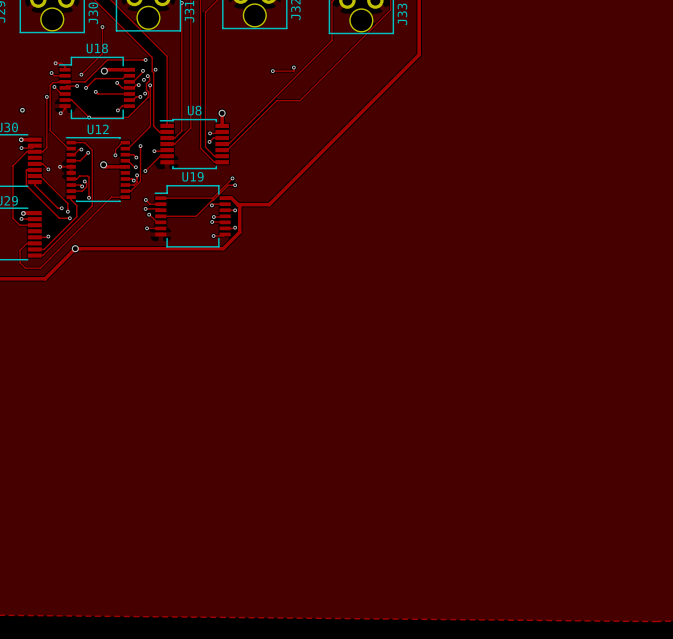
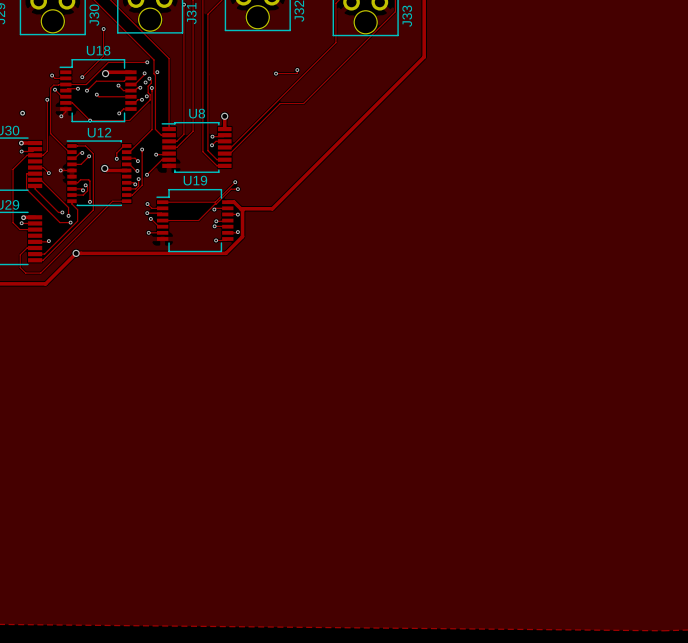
track: (55, 63) (61, 63) (65, 69) -> none
via: (55, 63) -> none

